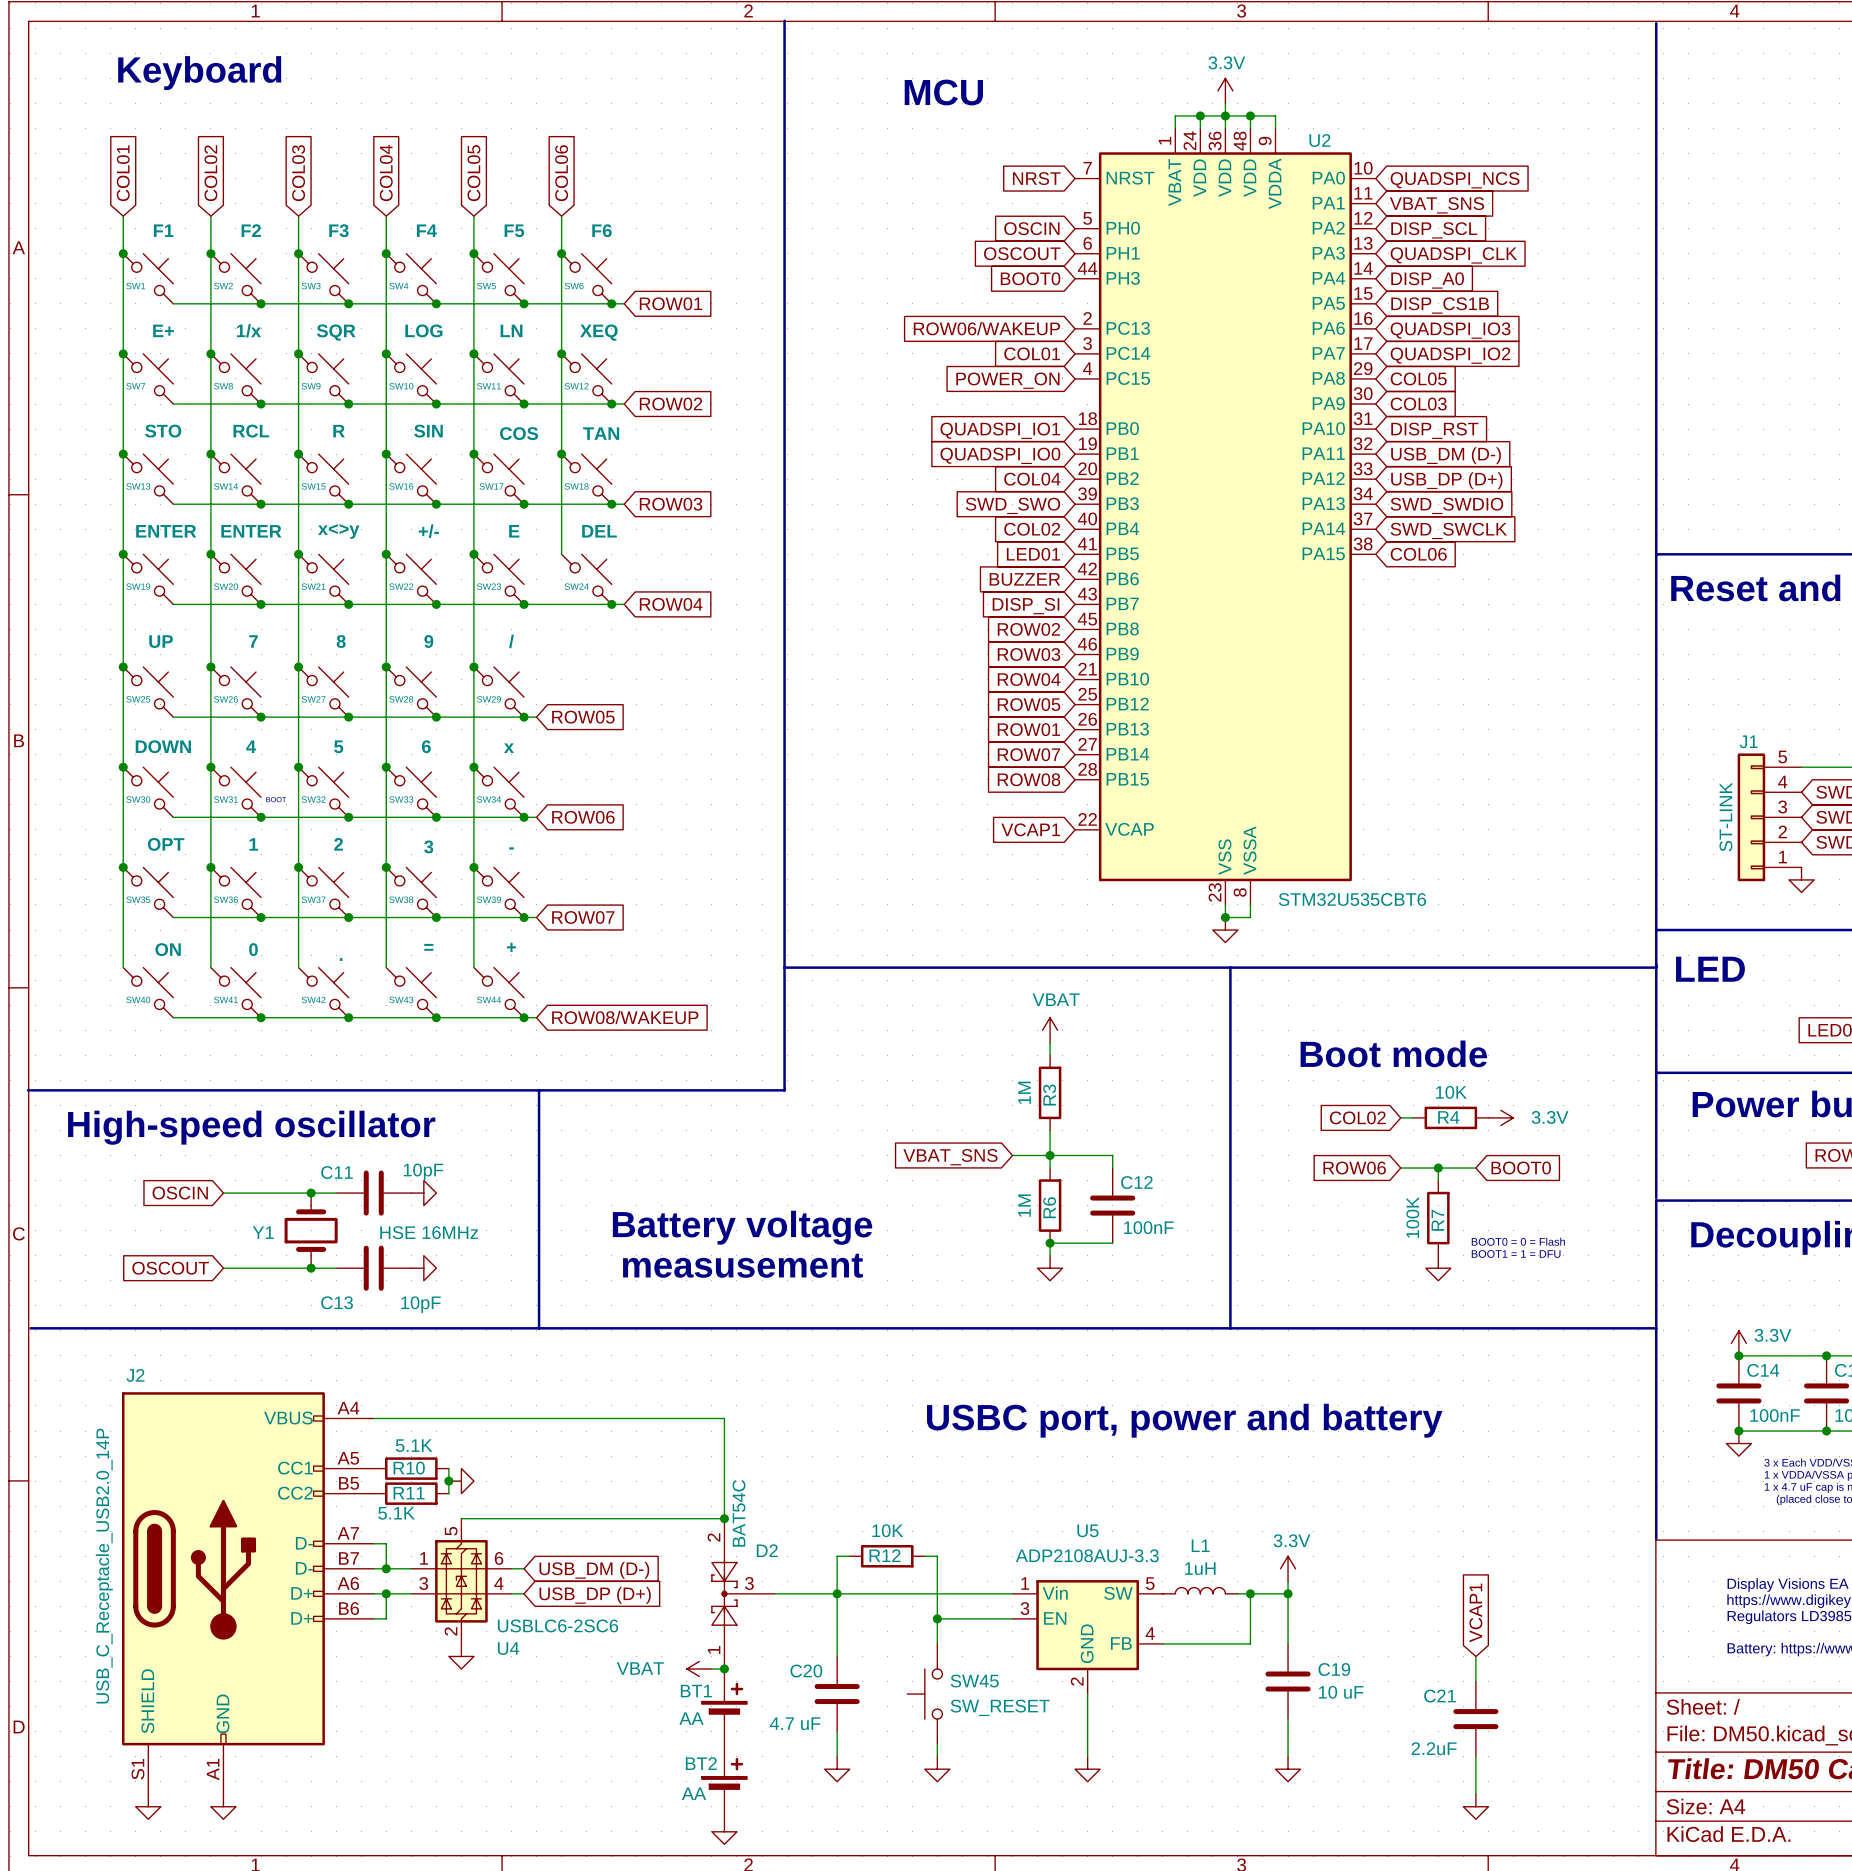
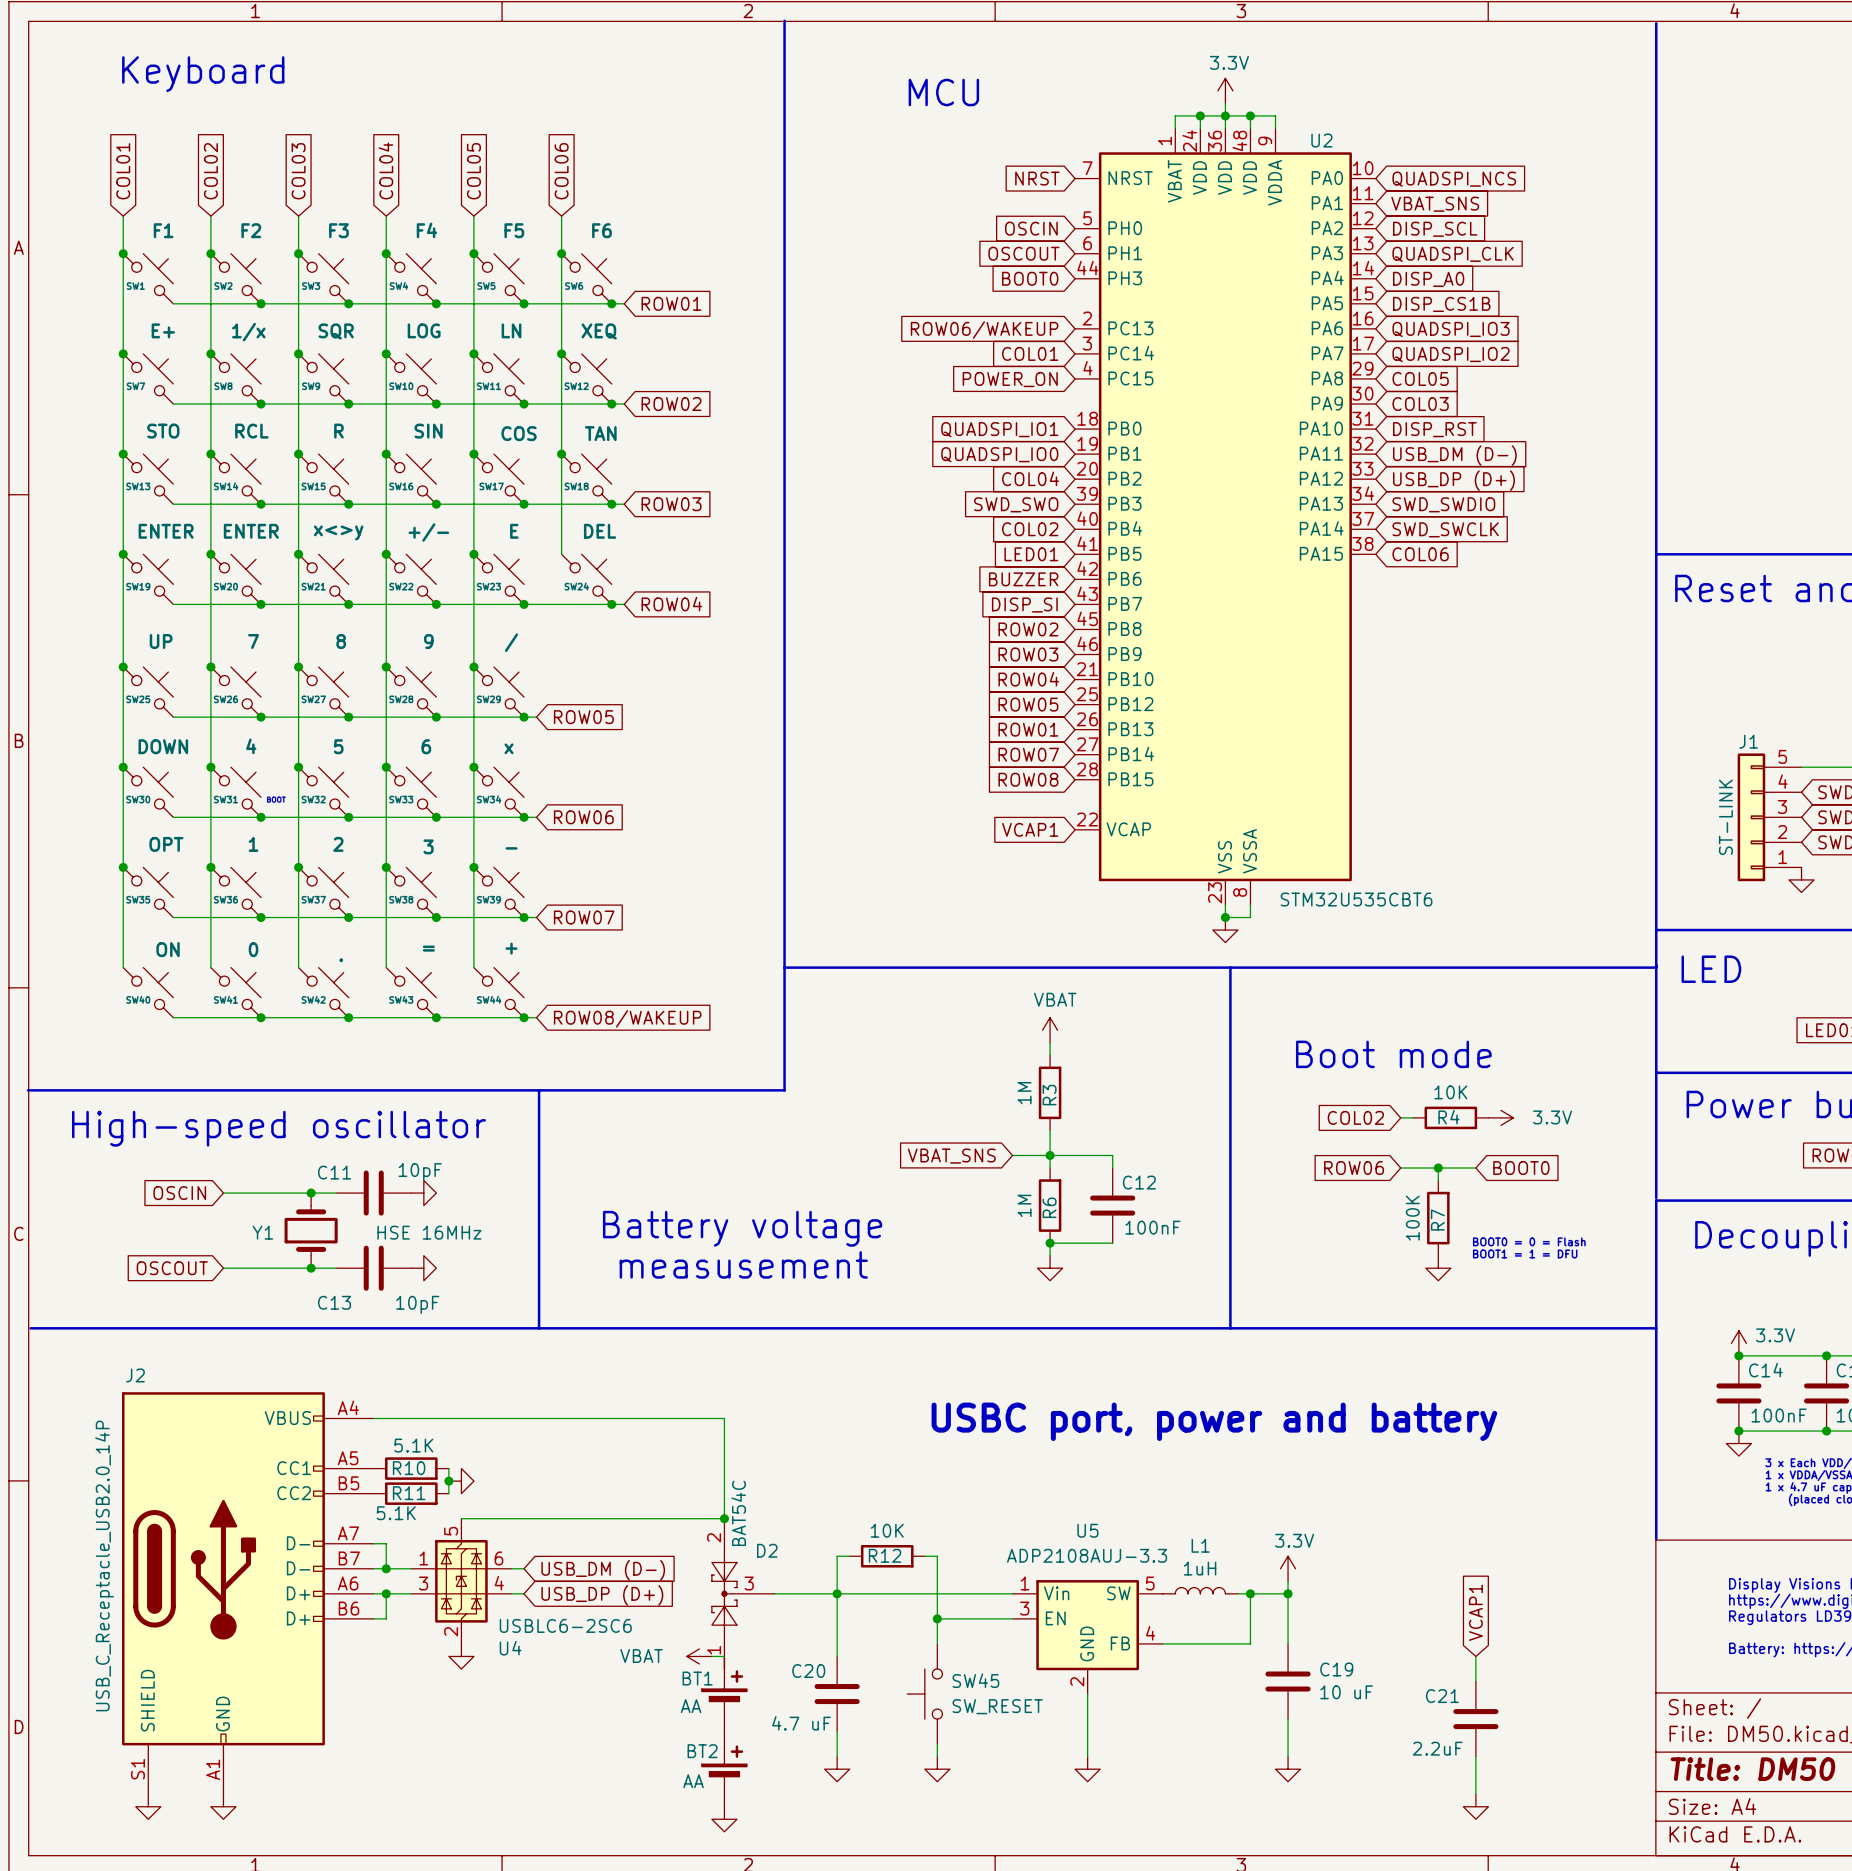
power symbol position: VBAT (699, 1668) -> VBAT (699, 1656)
wire: (711, 1668) (724, 1668) -> (711, 1656) (724, 1656)
junction: (724, 1668) -> none
BT1 position: (724, 1706) -> (724, 1694)
BT2 position: (724, 1781) -> (724, 1769)
power symbol position: (724, 1831) -> (724, 1819)

